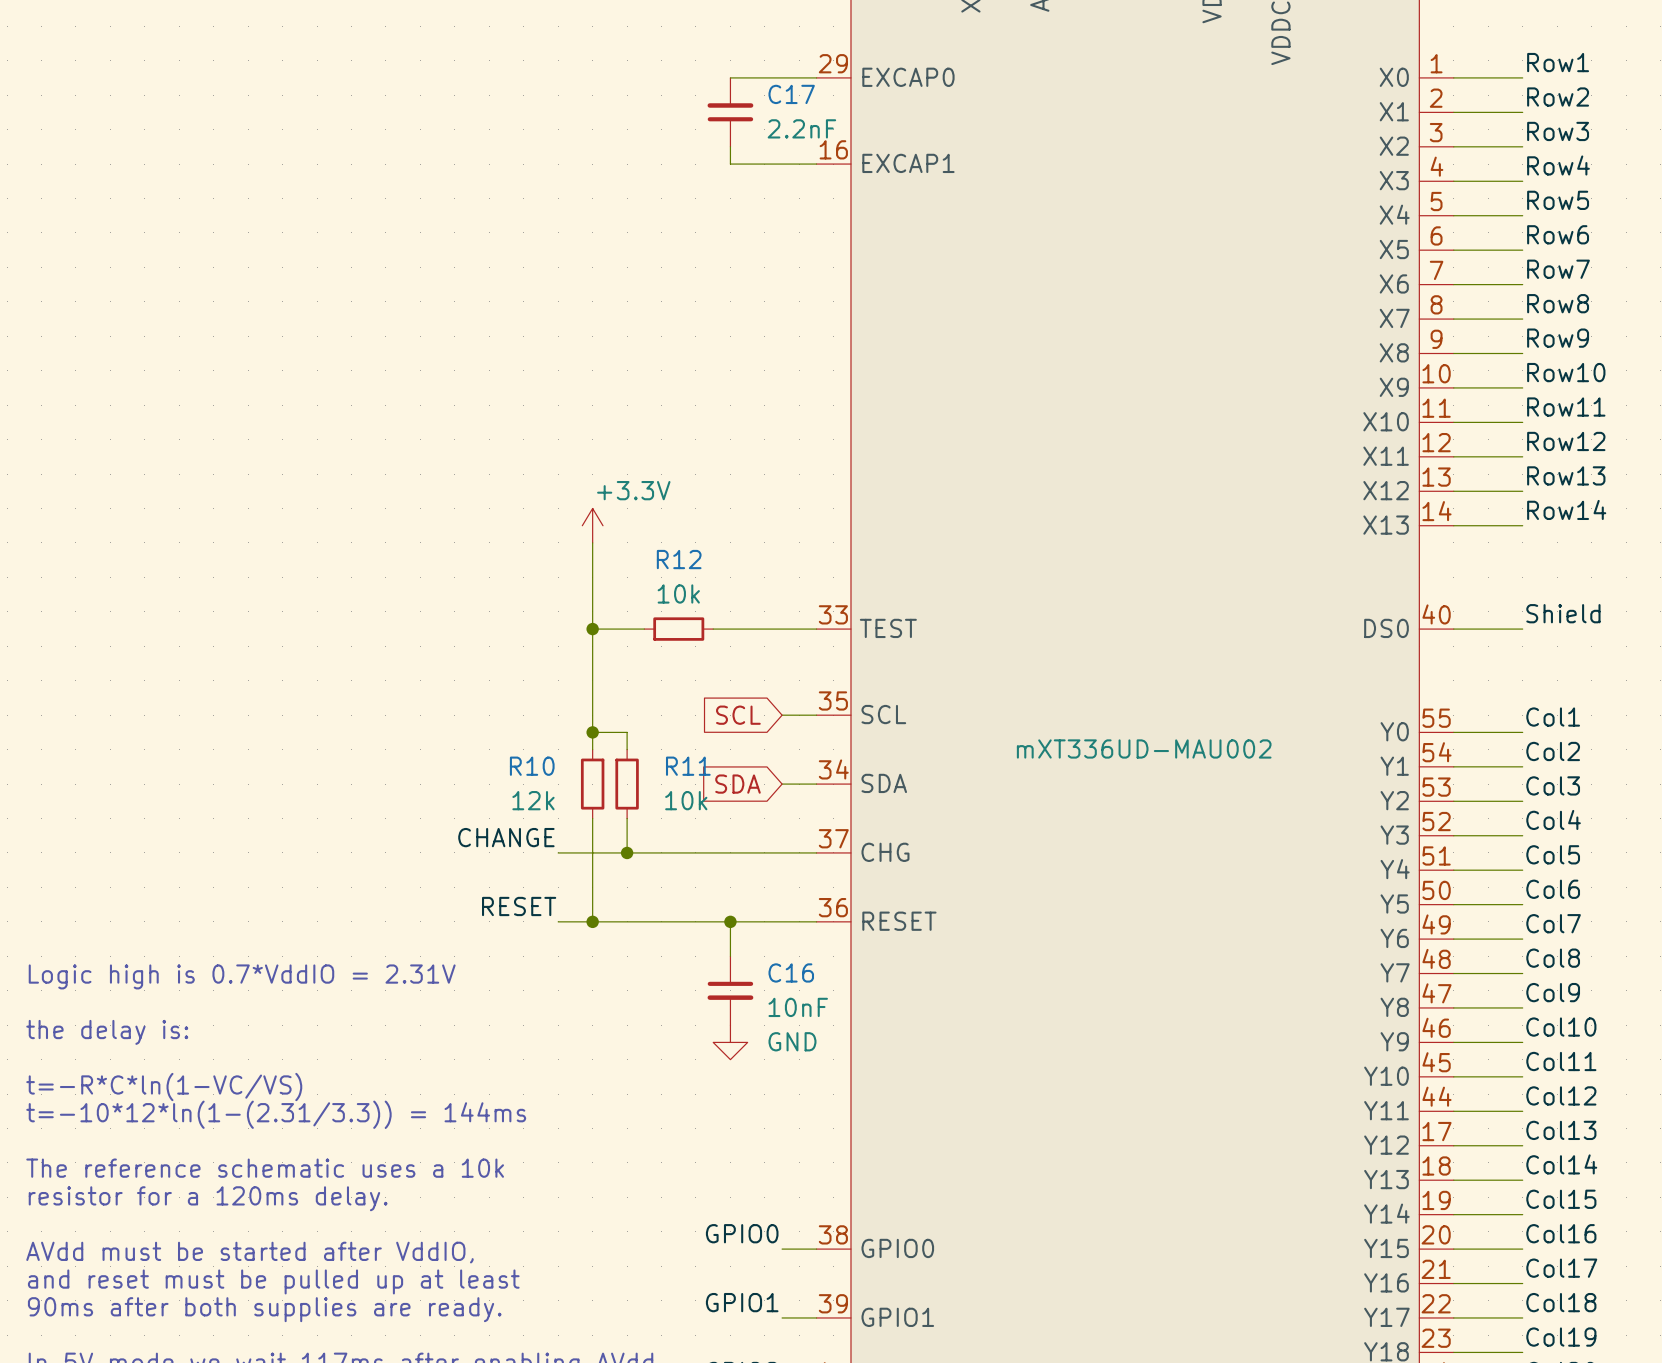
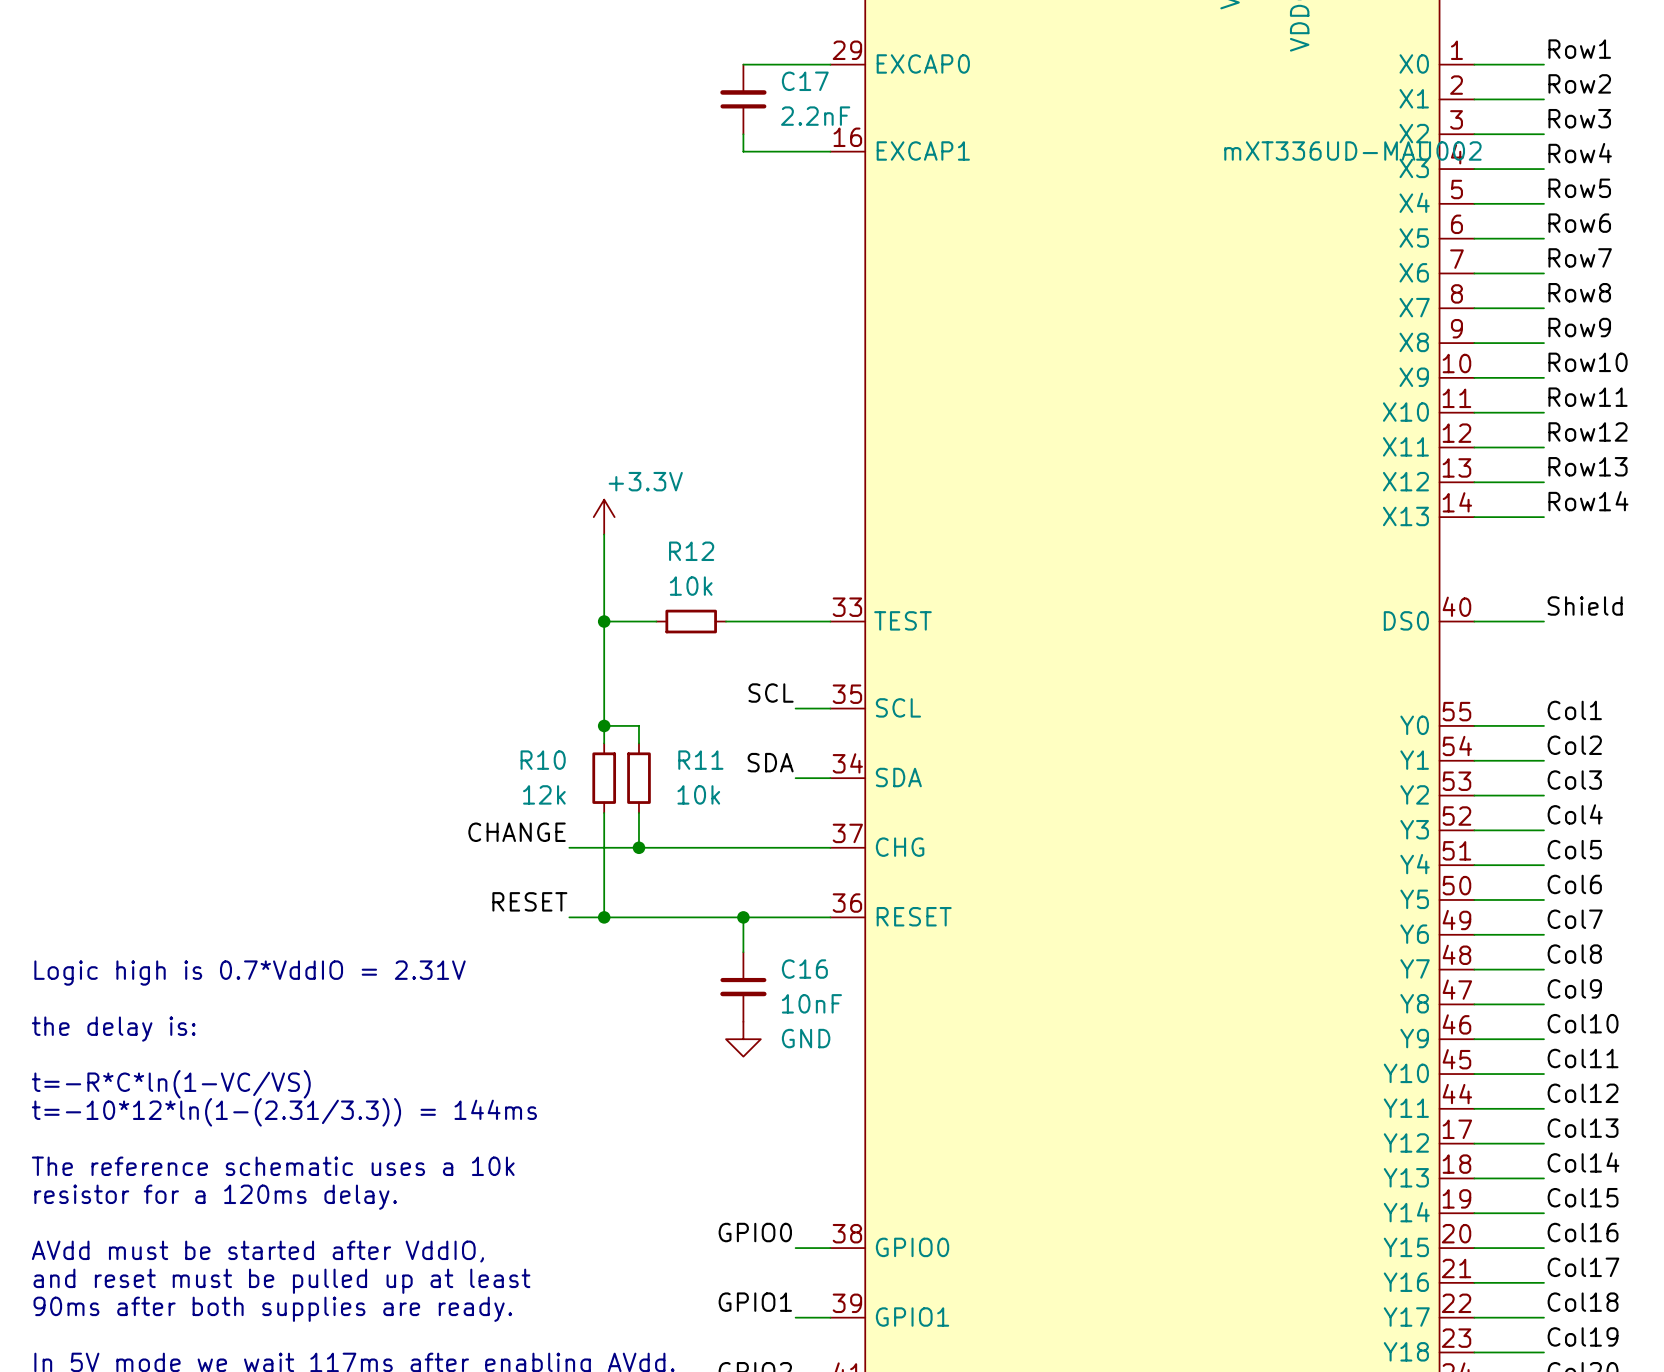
label: none -> SCL (771, 693)
global label: SCL (738, 715) -> none
part value position: mXT336UD-MAU002 (1144, 748) -> mXT336UD-MAU002 (1352, 150)
label: none -> SDA (770, 762)
global label: SDA (737, 784) -> none

